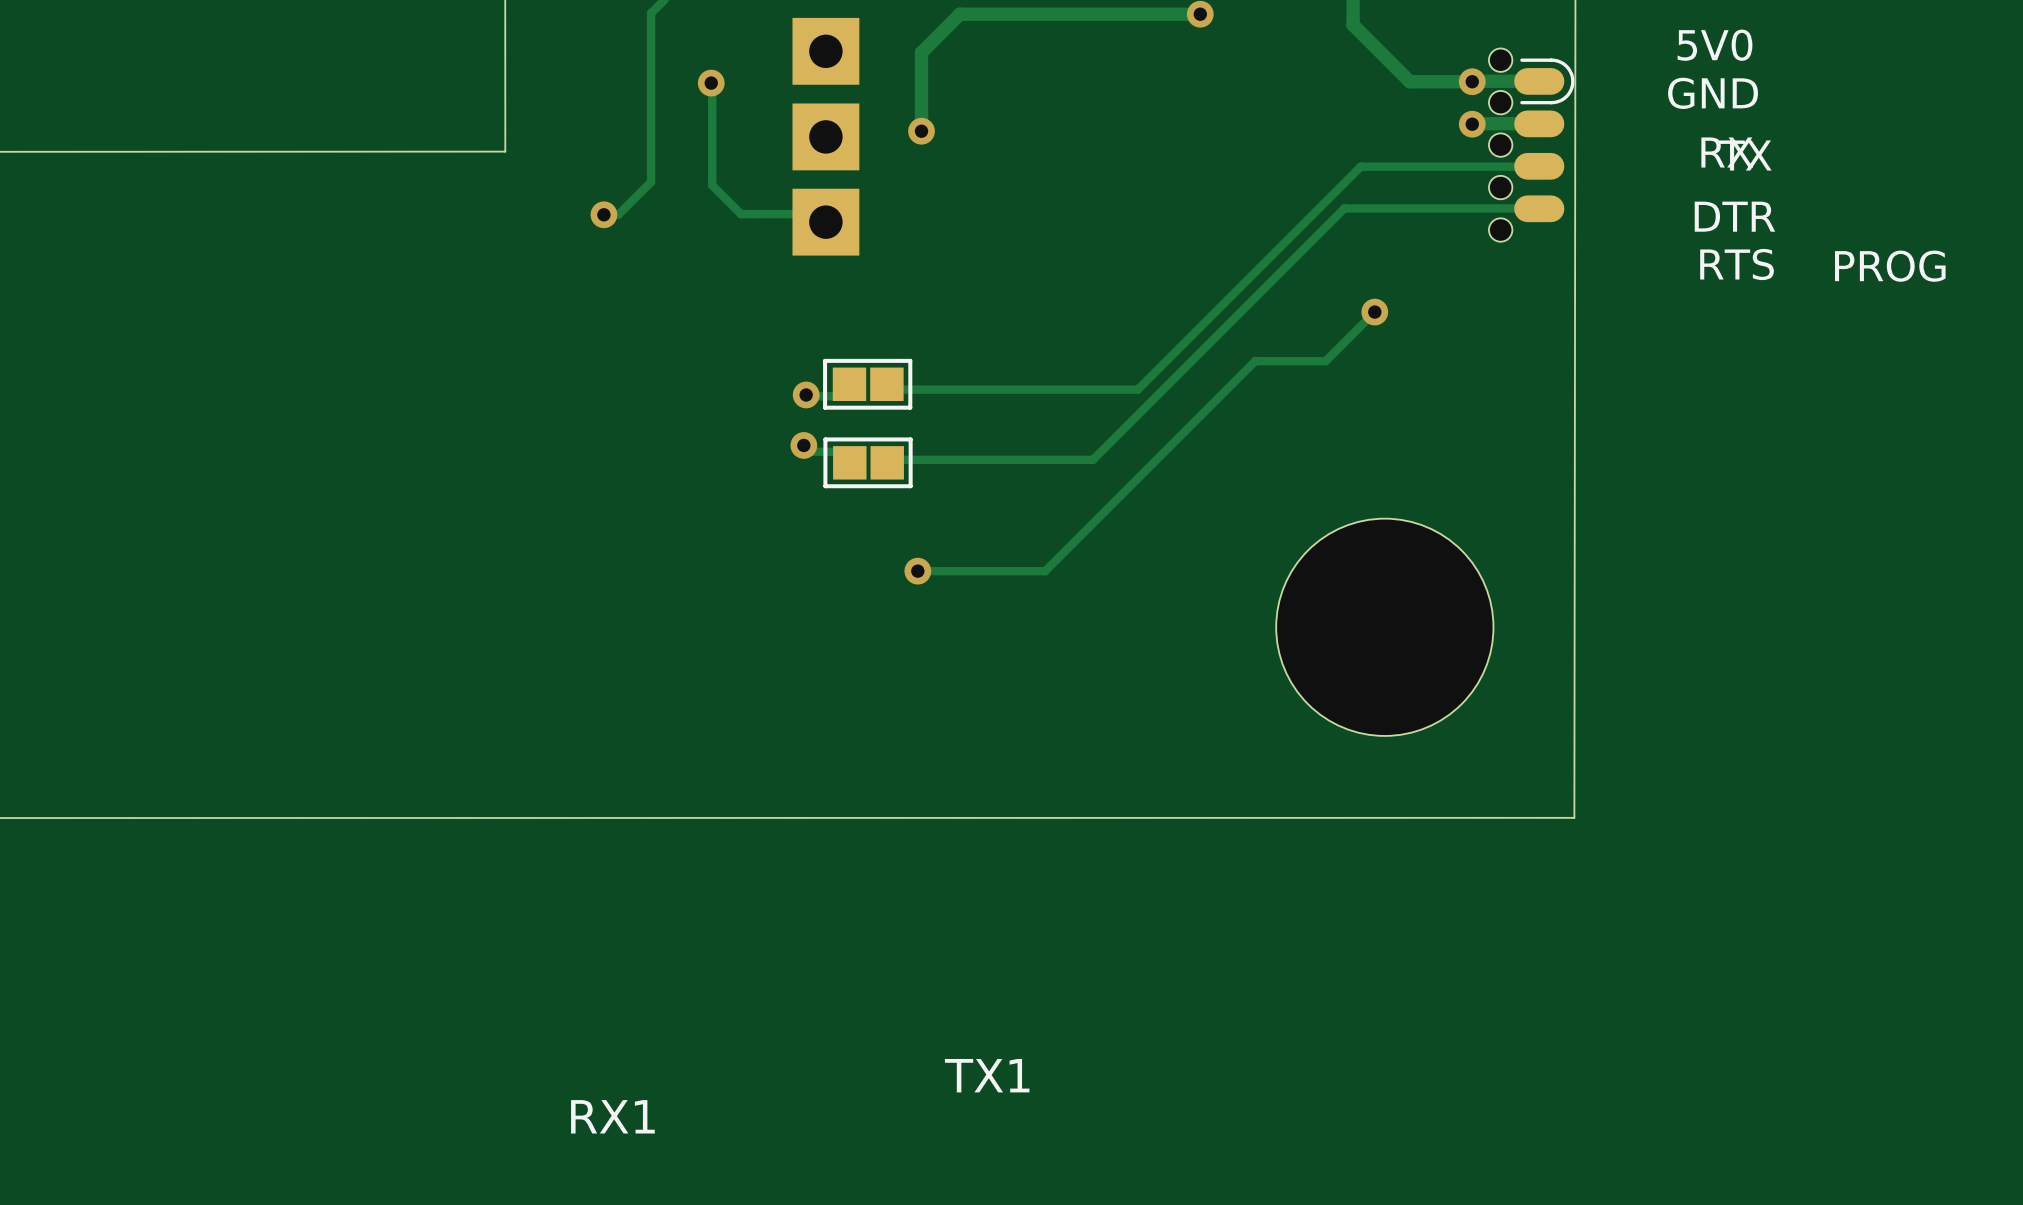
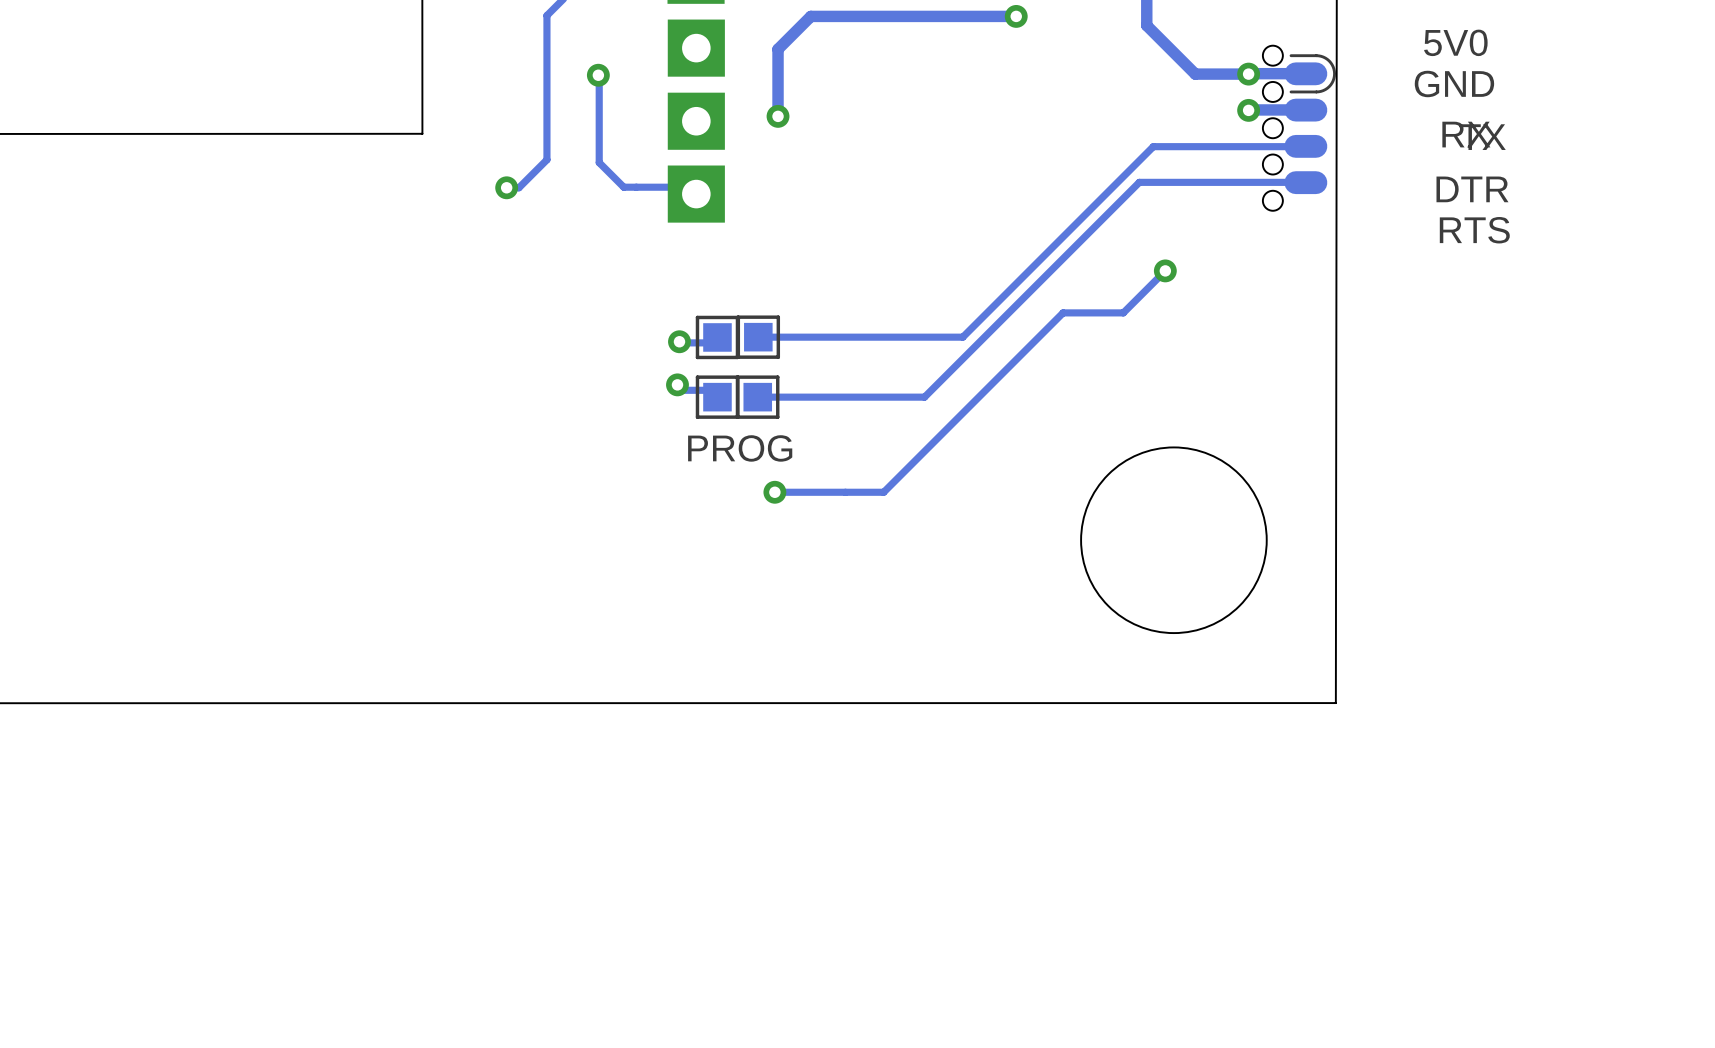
text: PROG (1890, 266) -> none
RX1: (867, 384) -> none
part: none -> (717, 337)
part: none -> (758, 337)
part: none -> (717, 397)
part: none -> (757, 397)
TX1: (868, 462) -> none
text: none -> PROG (740, 448)

